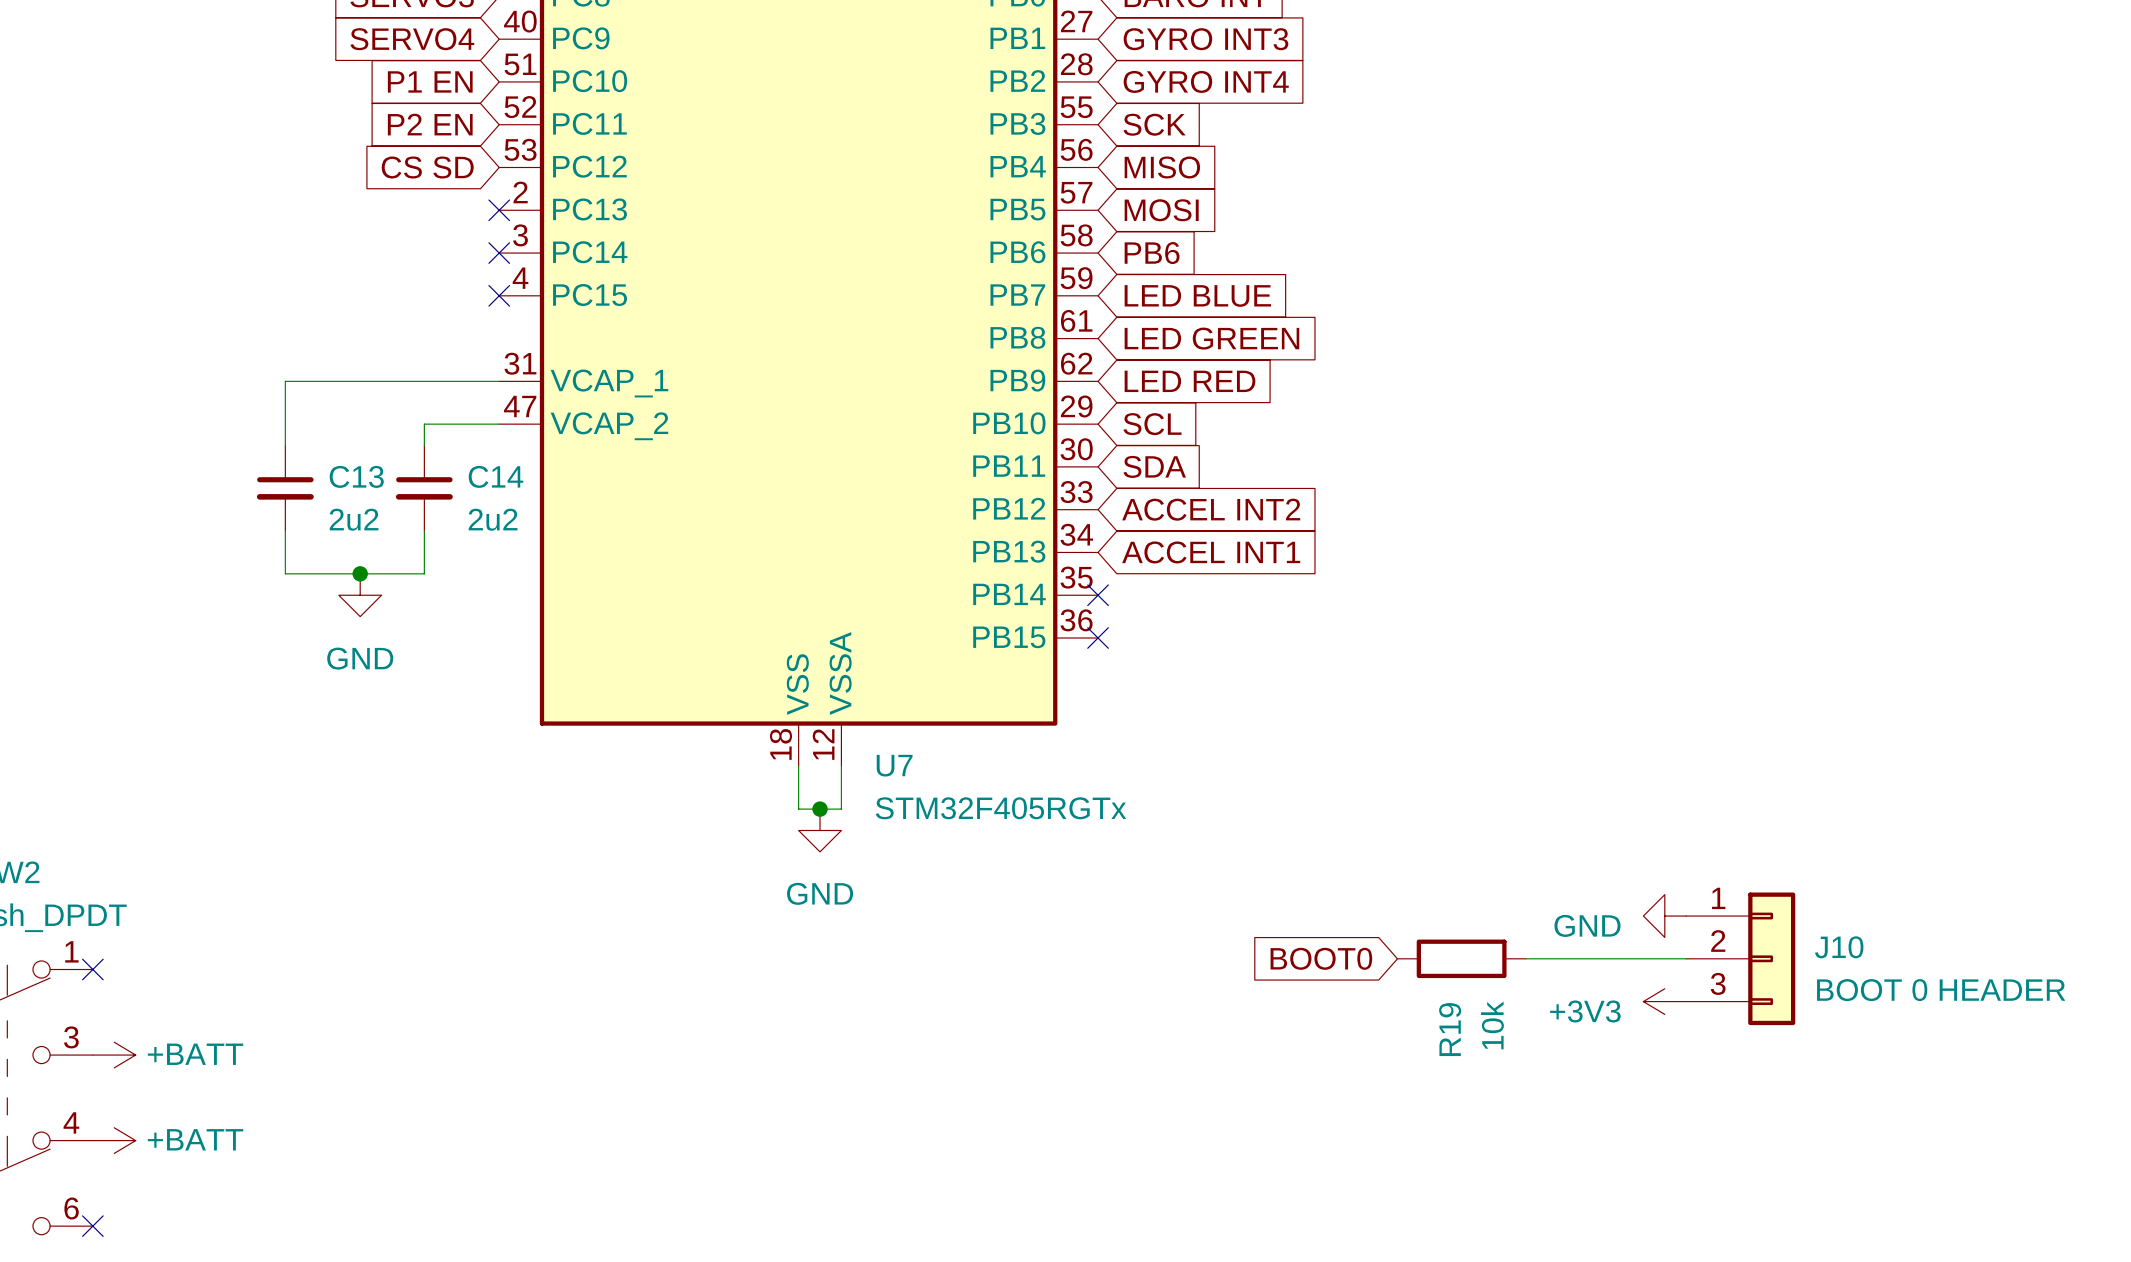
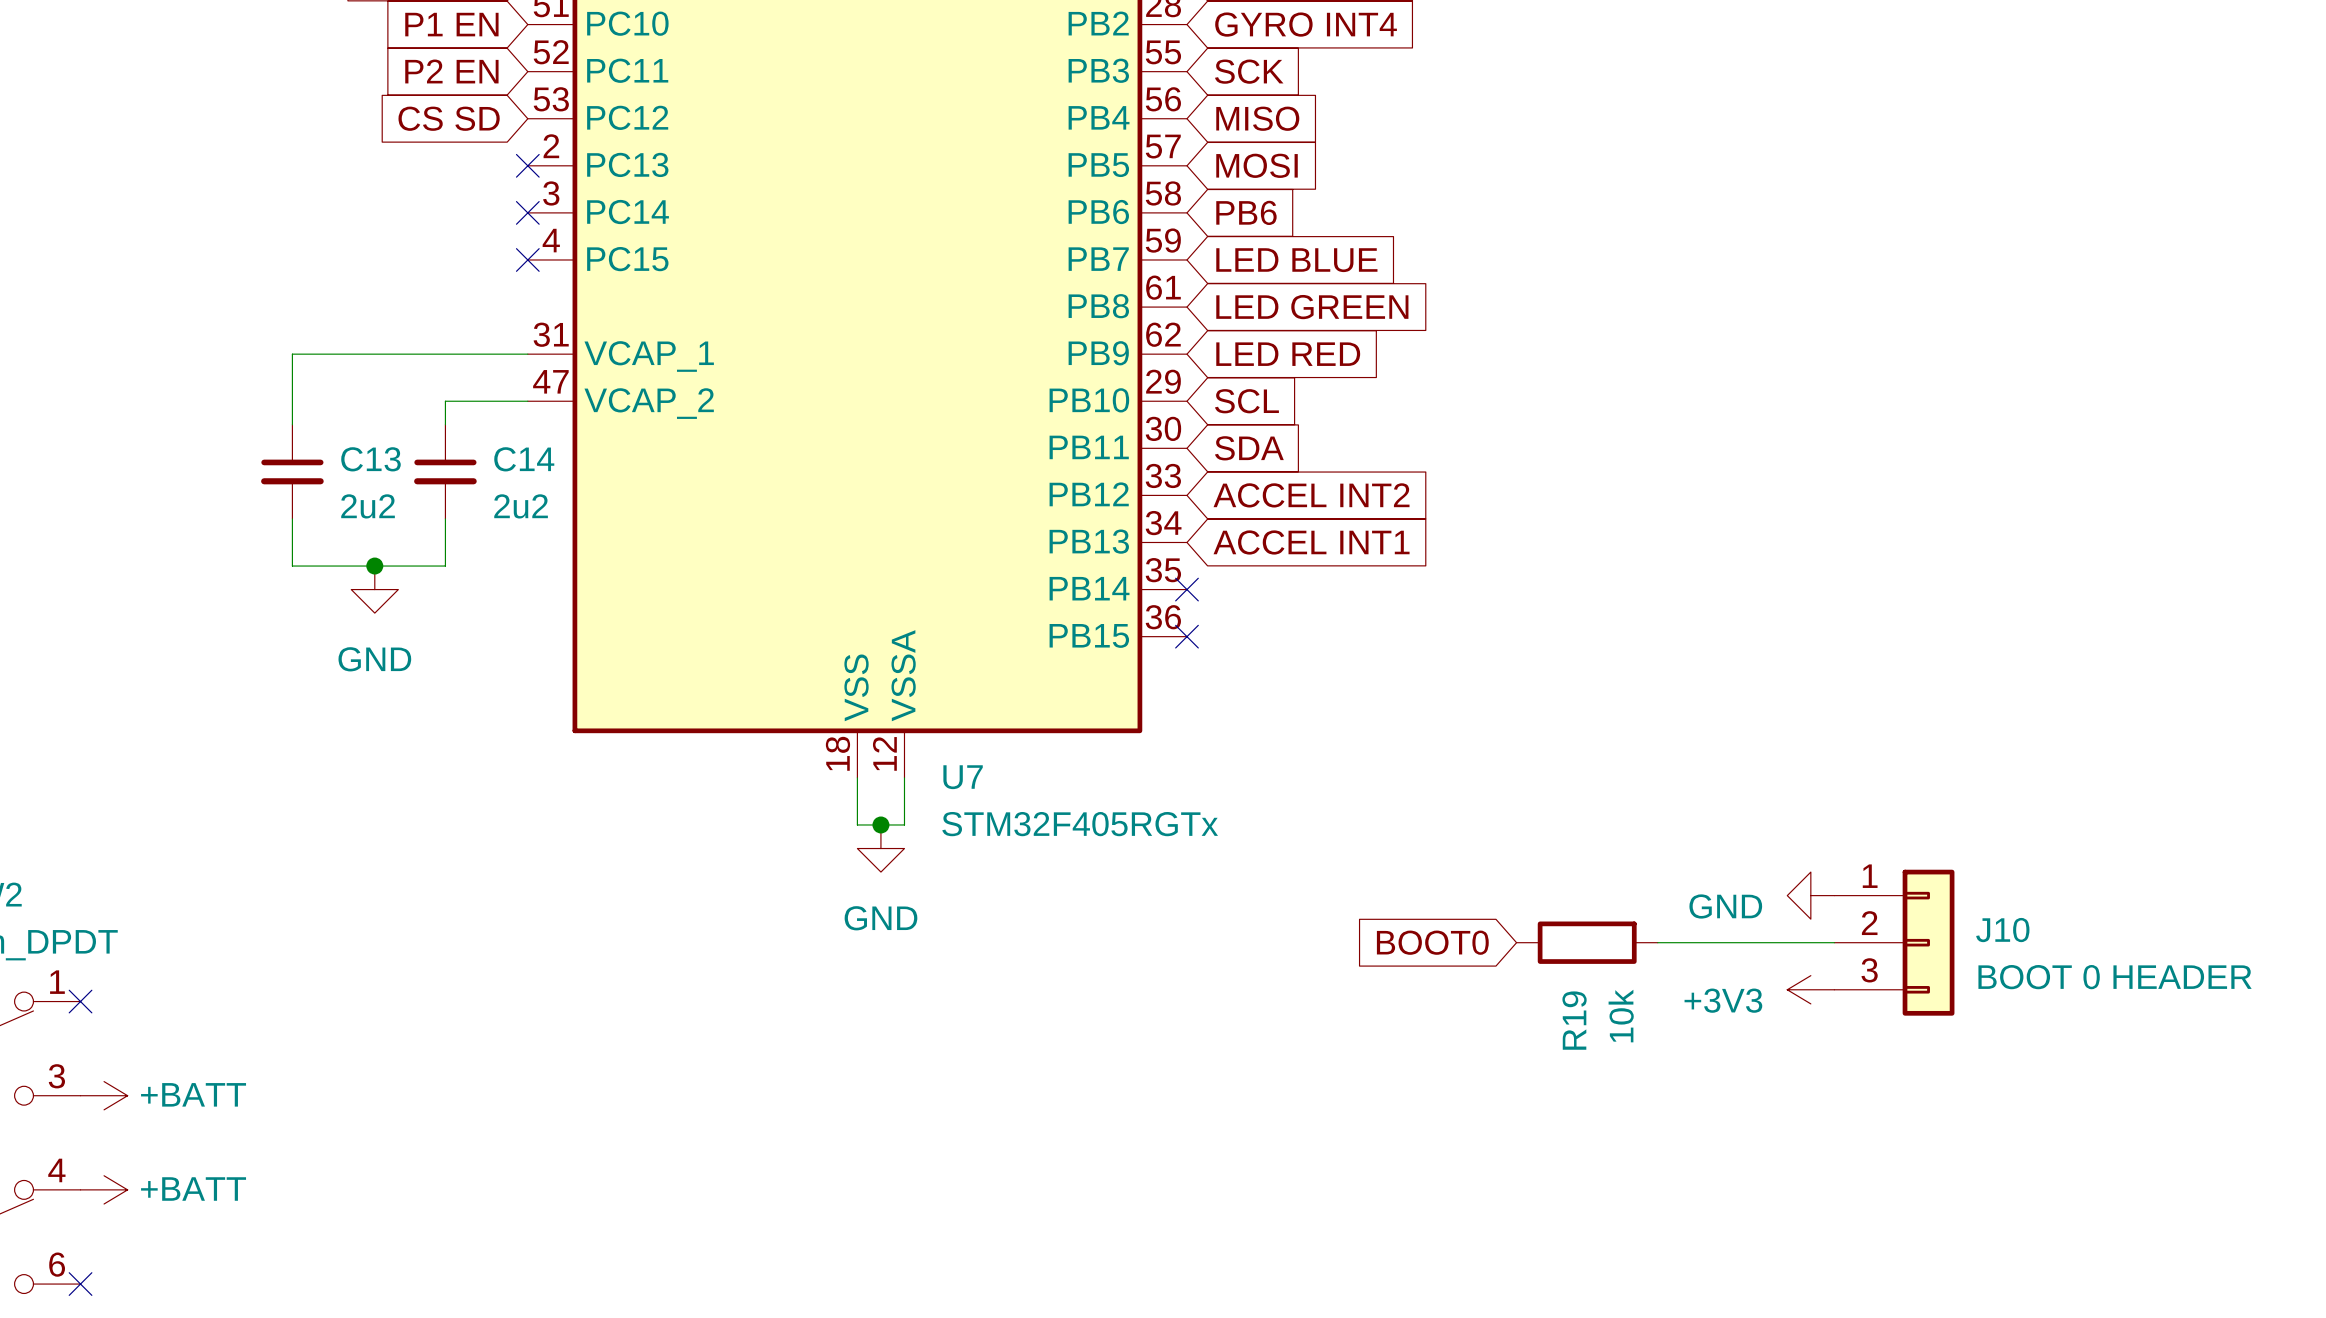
power symbol position: GND (1664, 916) -> GND (1810, 895)
global label position: BOOT0 (1321, 958) -> BOOT0 (1432, 942)
R19 position: (1461, 958) -> (1587, 942)
wire: (1525, 958) (1686, 958) -> (1657, 942) (1834, 942)
J10 position: (1740, 958) -> (1894, 942)
power symbol position: +3V3 (1664, 1001) -> +3V3 (1810, 989)

